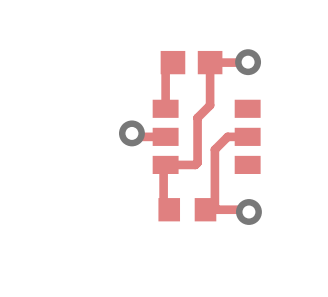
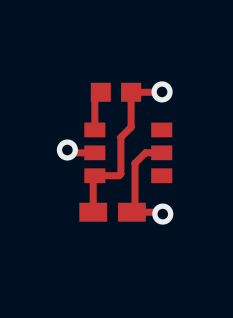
part footprint: [158, 198, 217, 222] -> [79, 202, 146, 222]

